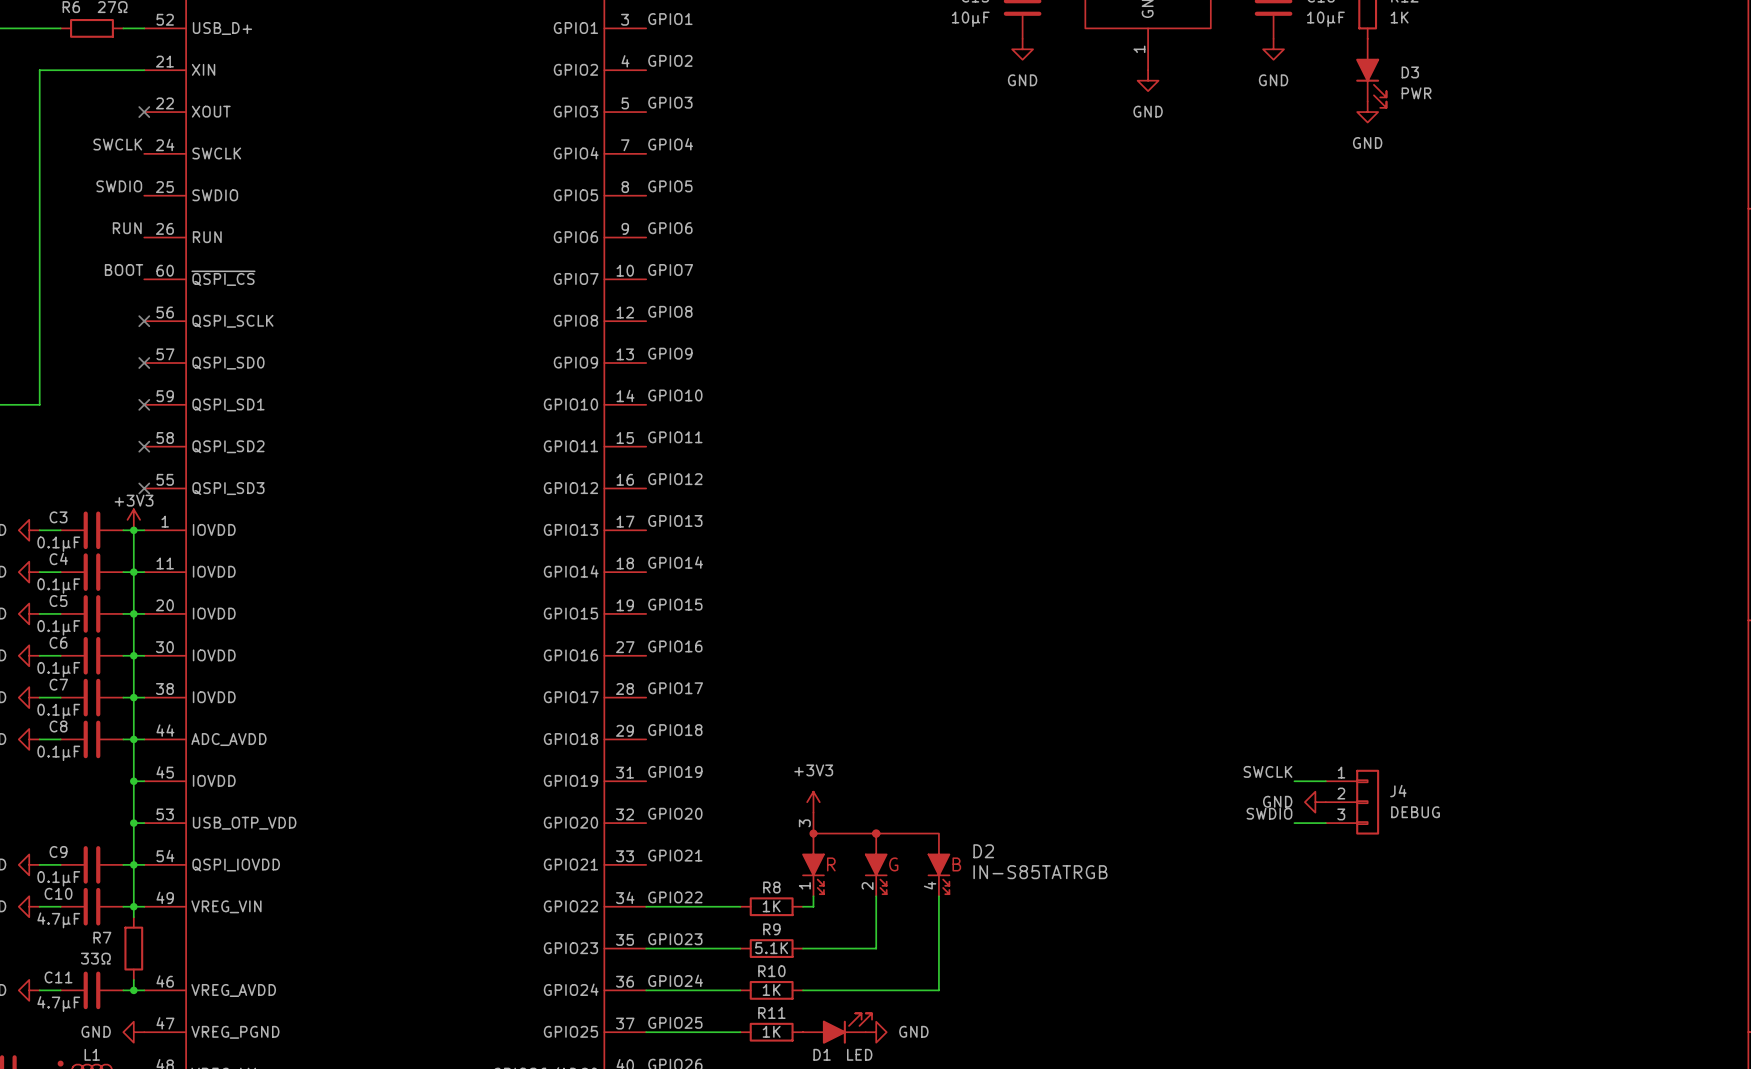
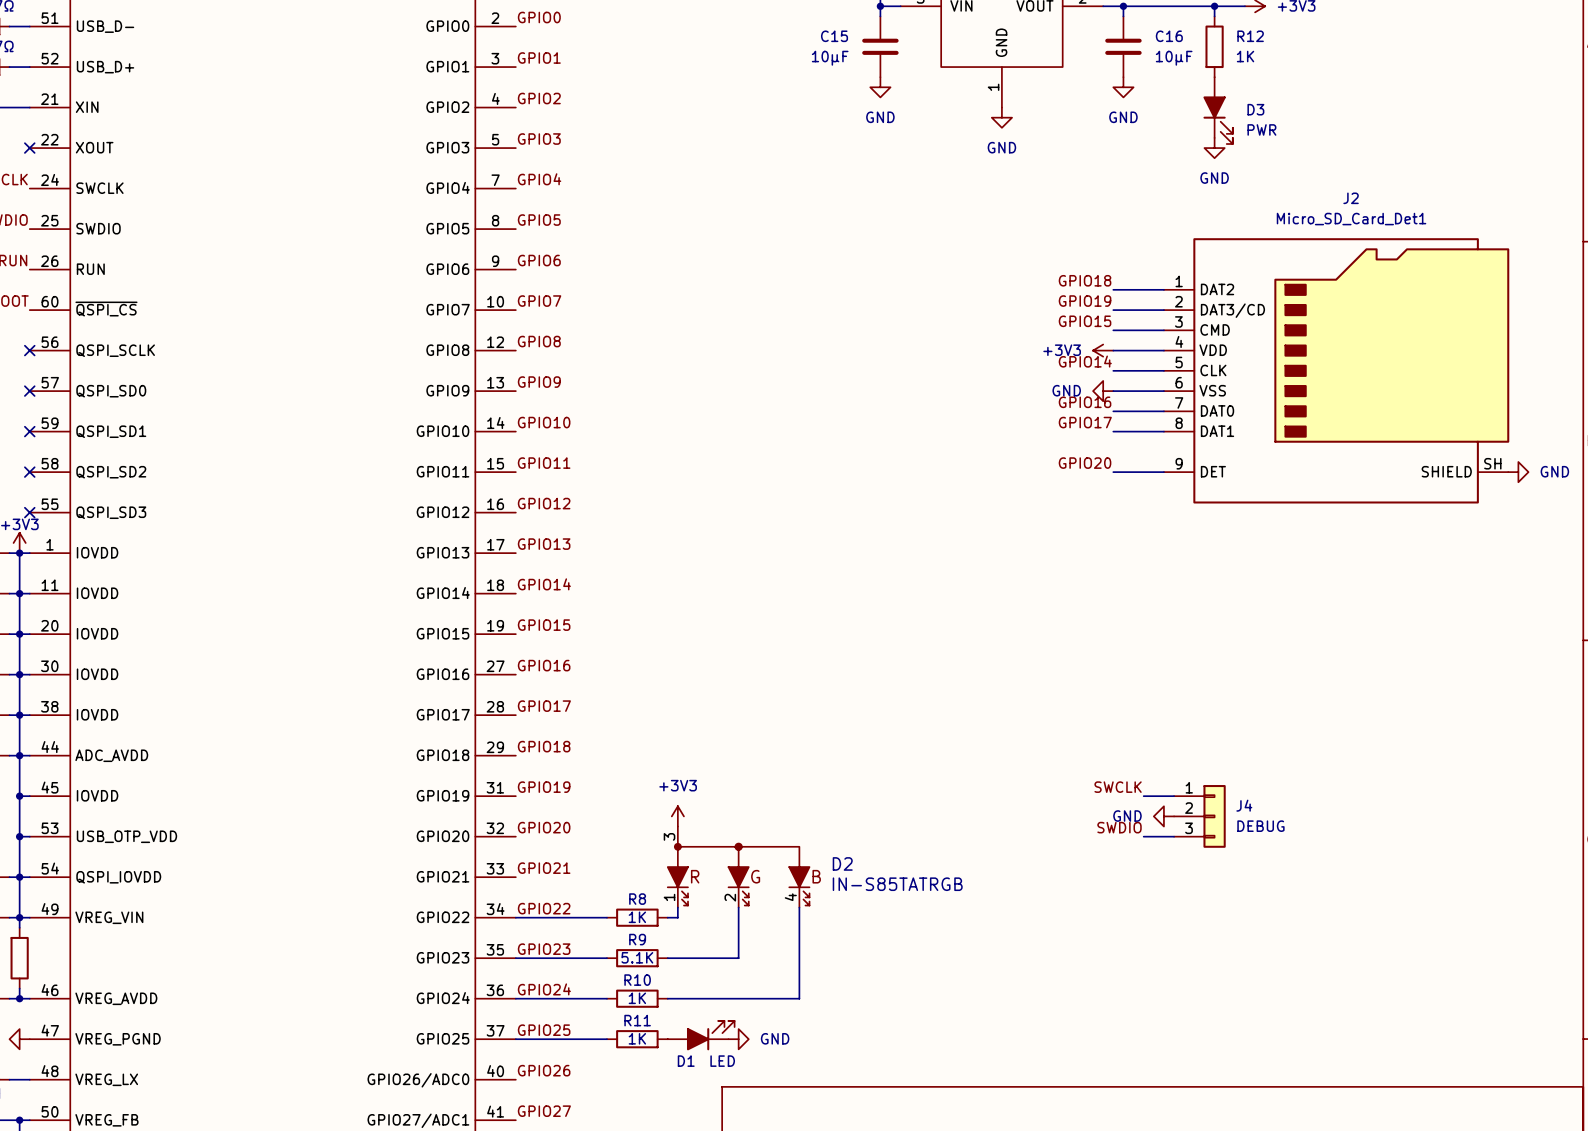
label: none -> GPIO18 (1085, 280)
wire: none -> (1113, 289) (1163, 289)
label: none -> GPIO19 (1085, 301)
wire: none -> (1113, 310) (1163, 310)
label: none -> GPIO15 (1085, 321)
wire: none -> (1113, 330) (1163, 330)
power symbol: none -> +3V3 (1103, 350)
wire: none -> (1113, 350) (1163, 350)
label: none -> GPIO14 (1085, 361)
wire: none -> (1113, 370) (1163, 370)
J2: none -> Micro_SD_Card_Det1 (1336, 370)
power symbol: none -> GND (1103, 391)
wire: none -> (1113, 391) (1163, 391)
label: none -> GPIO16 (1085, 402)
wire: none -> (1113, 411) (1163, 411)
label: none -> GPIO17 (1085, 422)
wire: none -> (1113, 431) (1163, 431)
label: none -> GPIO20 (1085, 463)
wire: none -> (1113, 472) (1163, 472)
power symbol: none -> GND (1518, 472)

